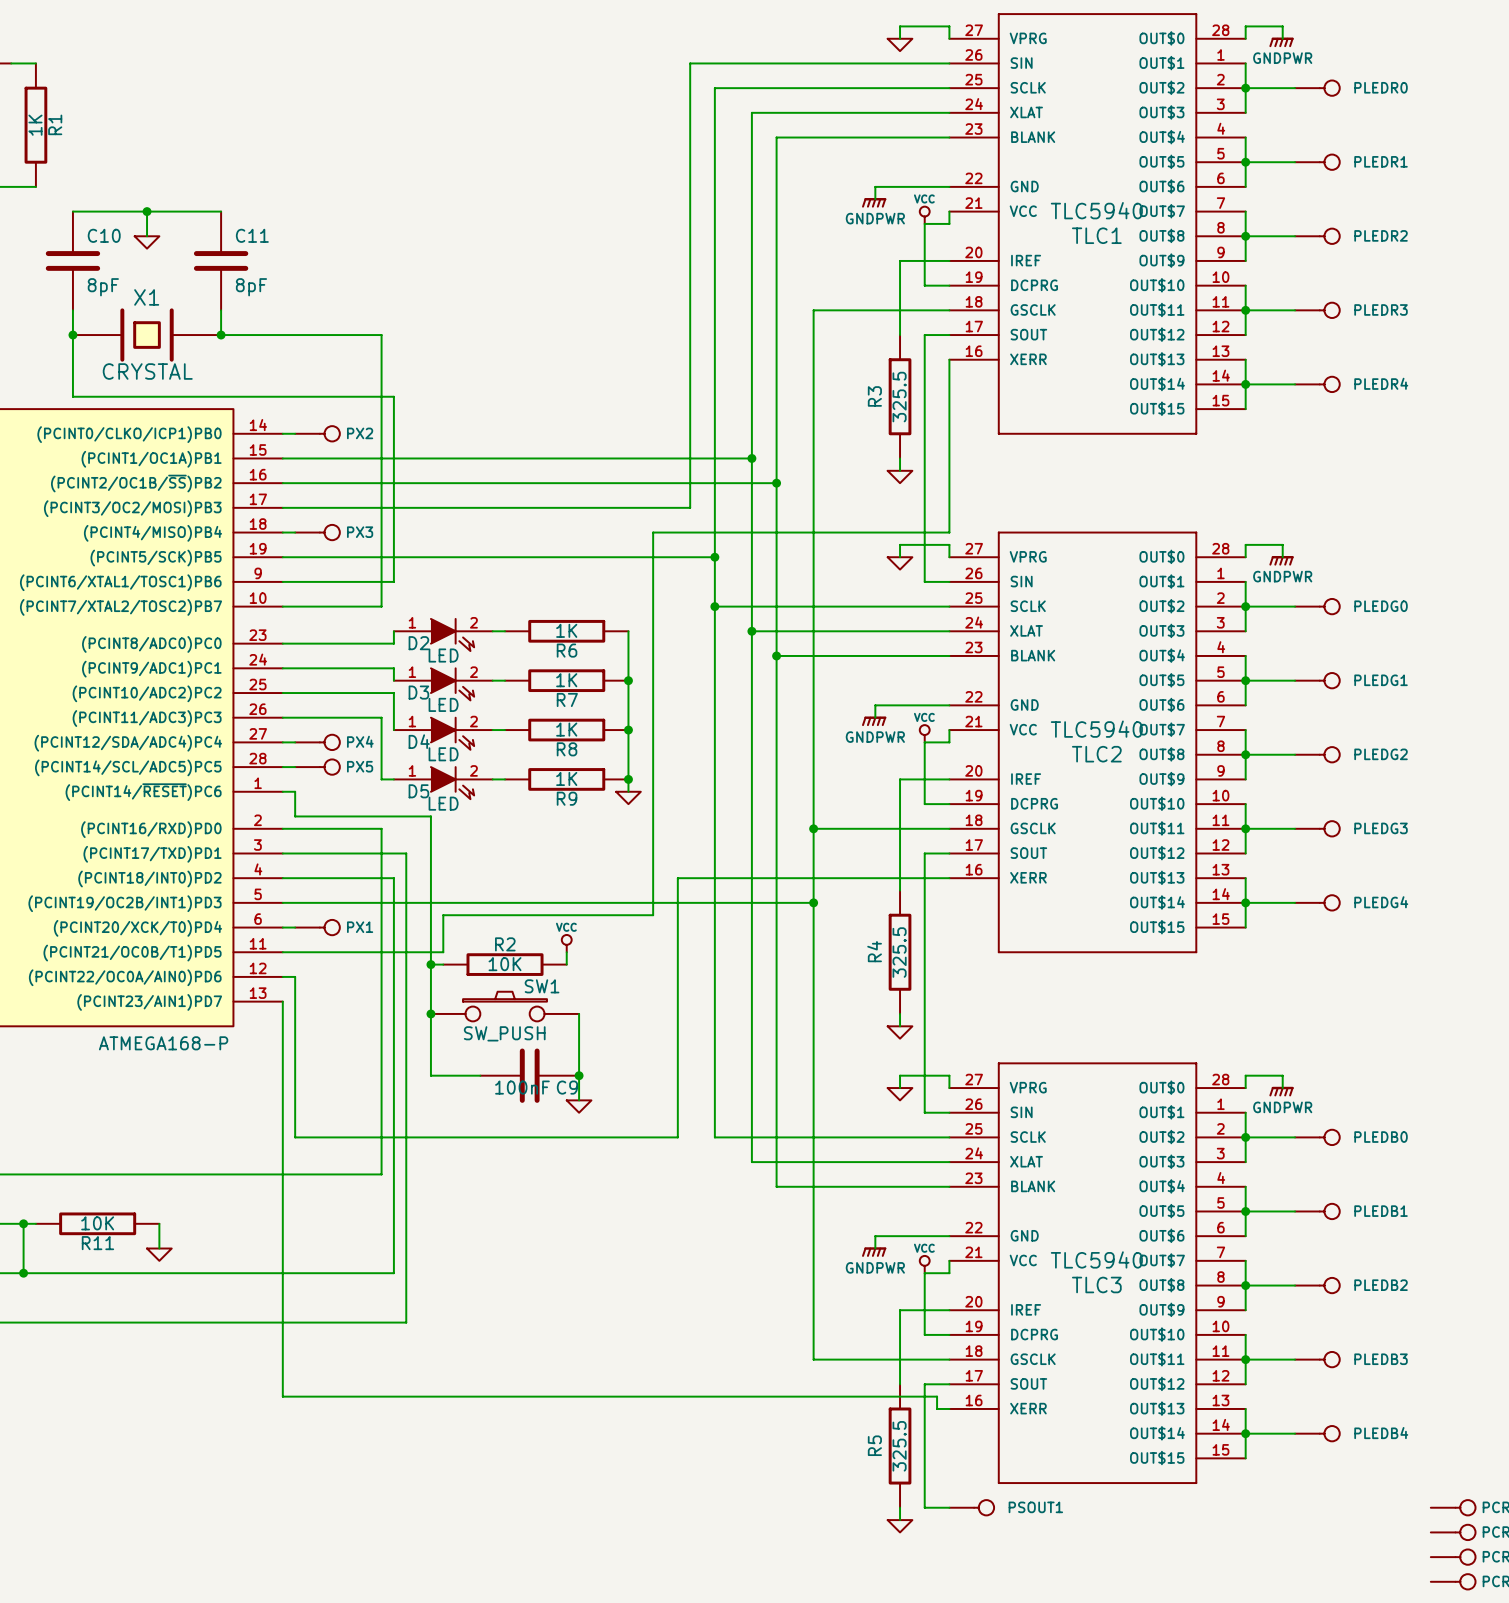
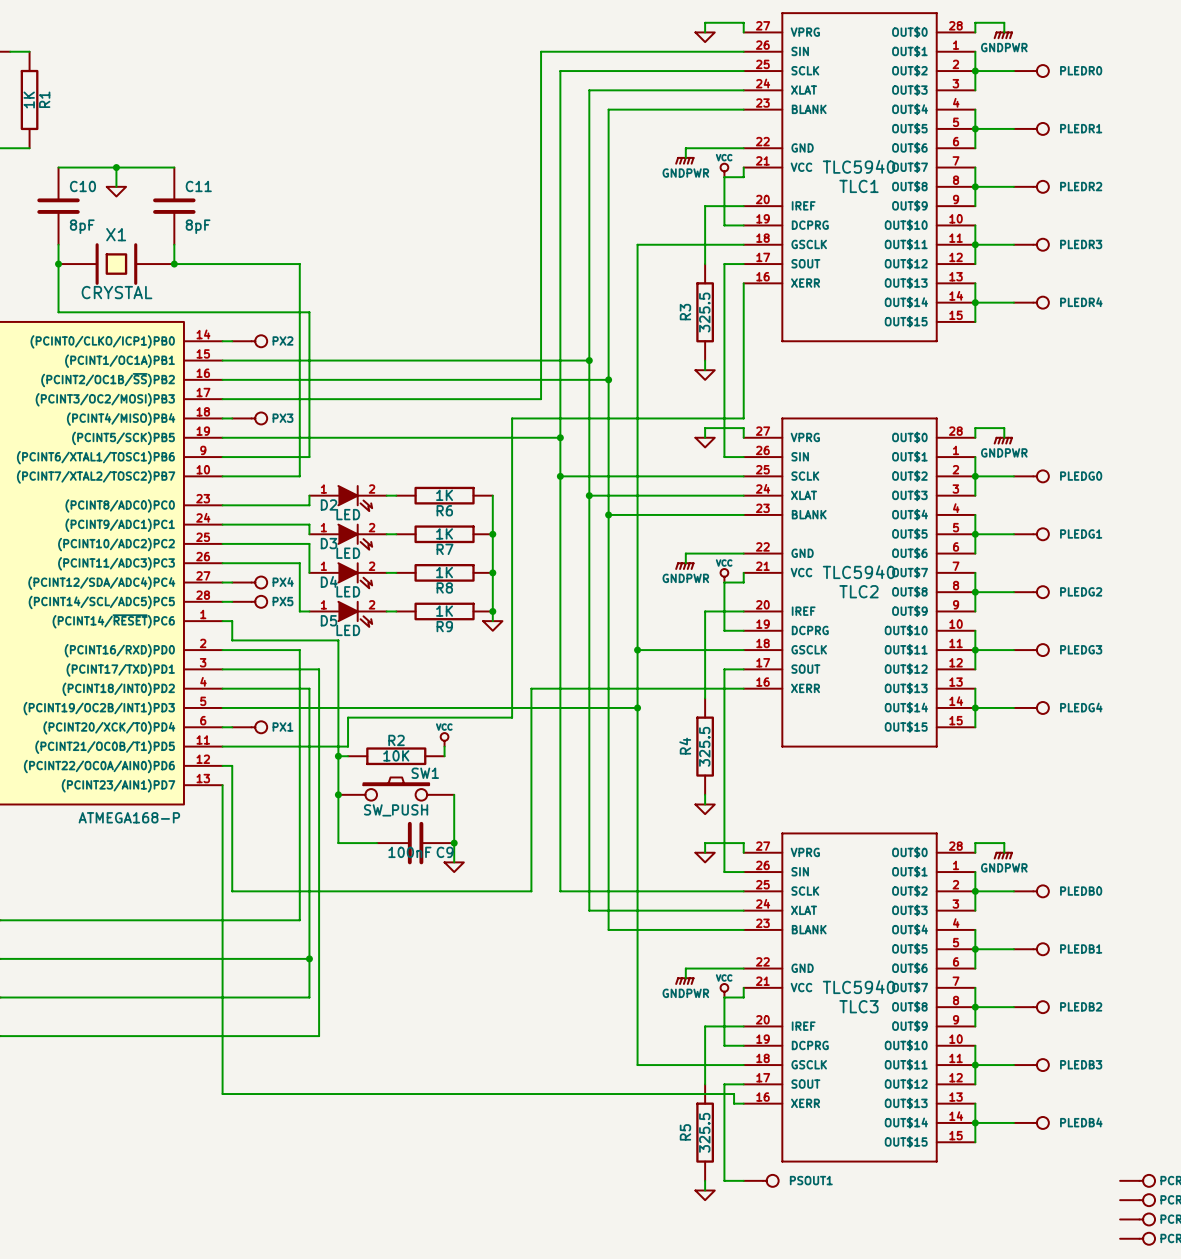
wire: (23, 1223) (23, 1273) -> none
junction: (23, 1223) -> none
wire: none -> (29, 958) (309, 958)
R11: 10K (97, 1223) -> none
wire: (159, 1223) (159, 1248) -> none
junction: none -> (309, 958)
power symbol: (159, 1254) -> none
junction: (23, 1273) -> none

